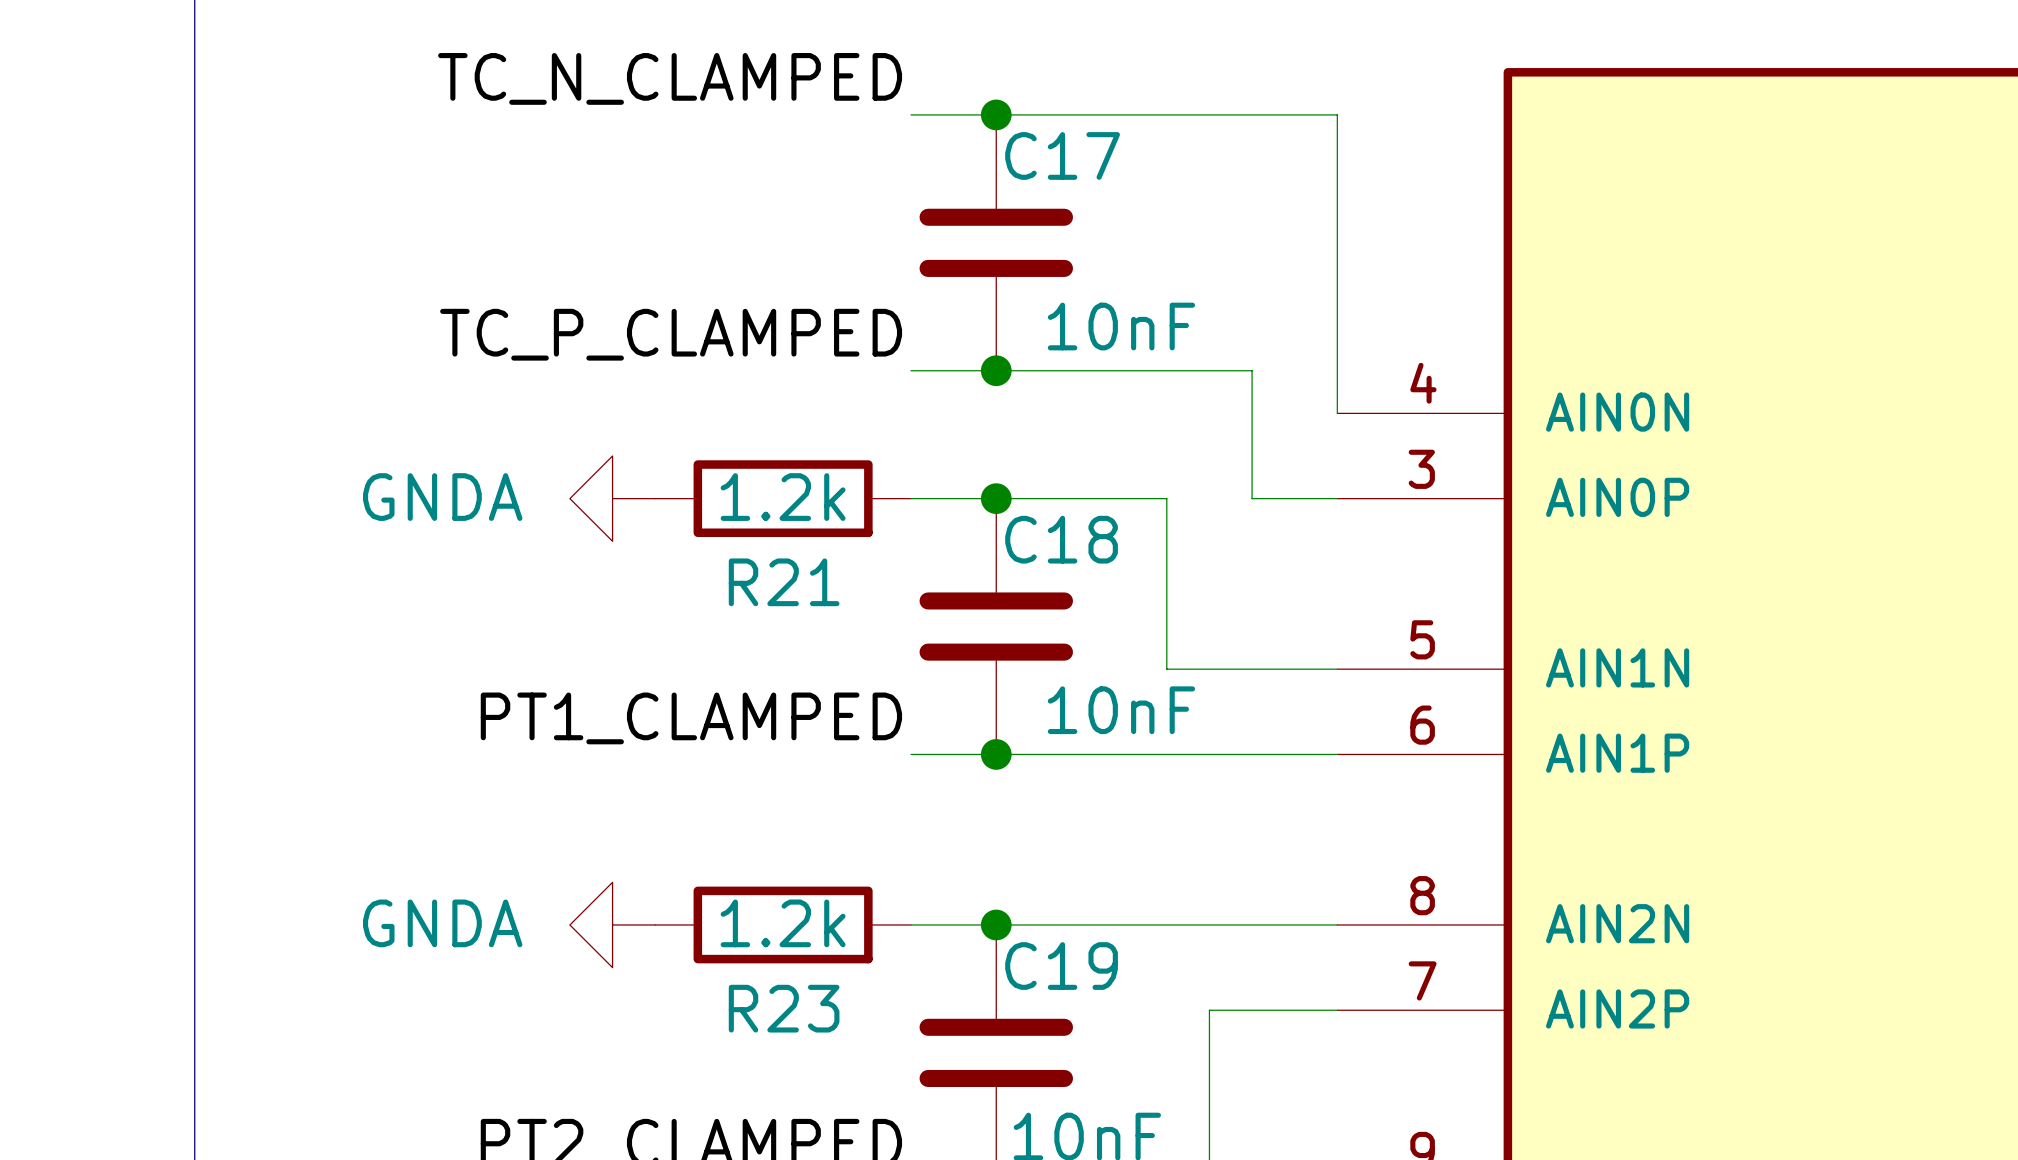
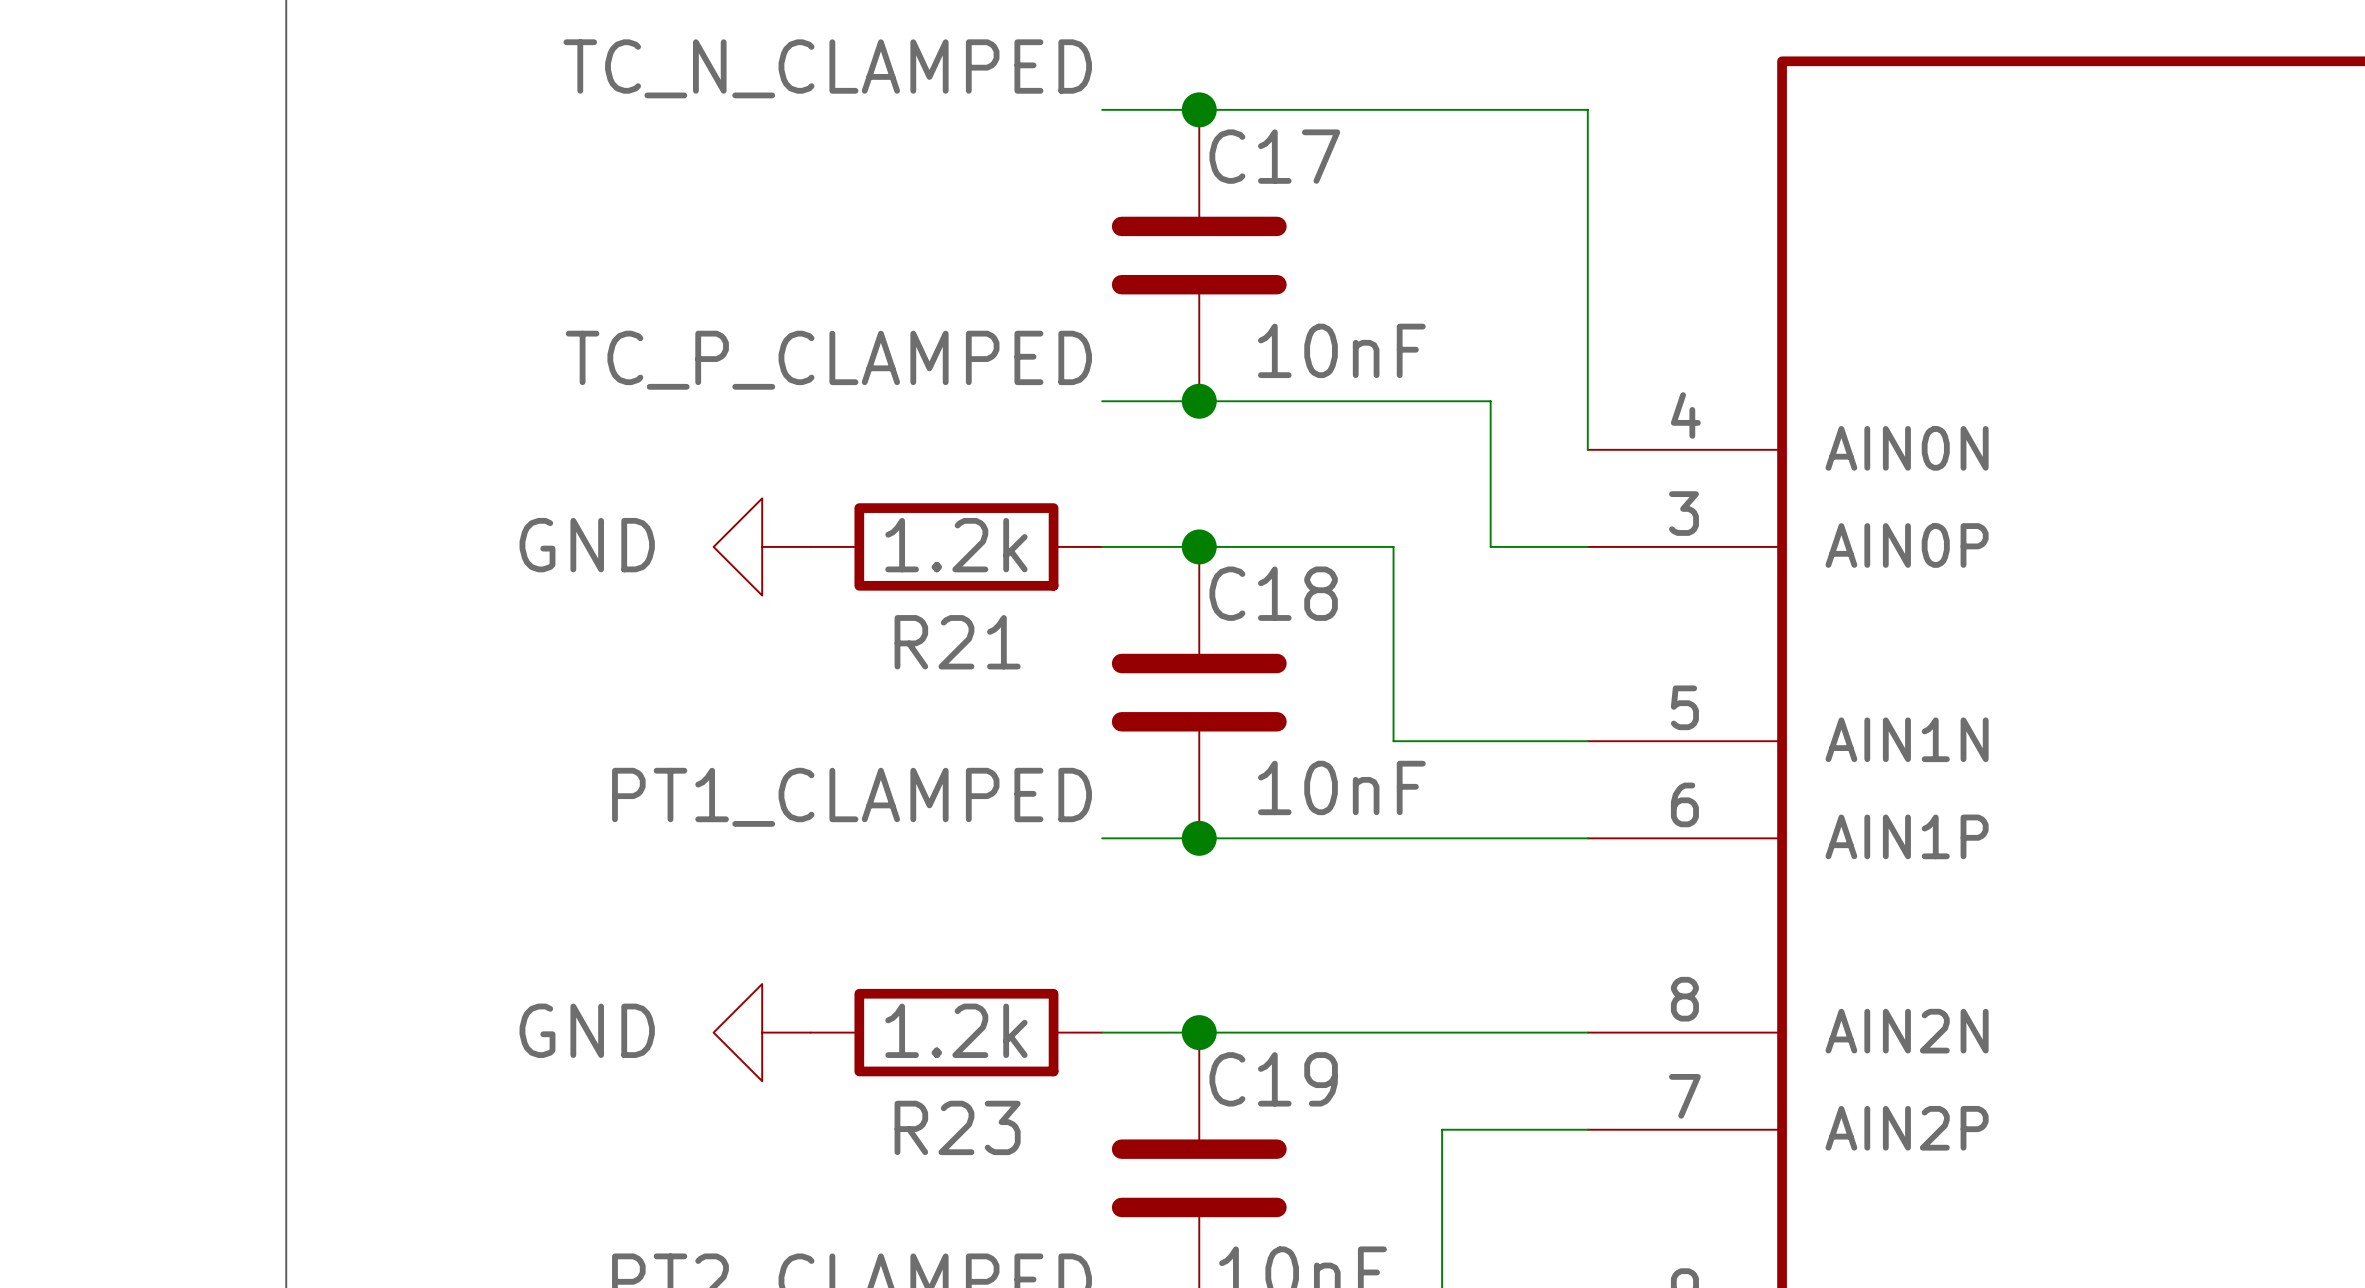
power symbol: GNDA (612, 498) -> GND (762, 546)
power symbol: GNDA (612, 924) -> GND (762, 1032)

